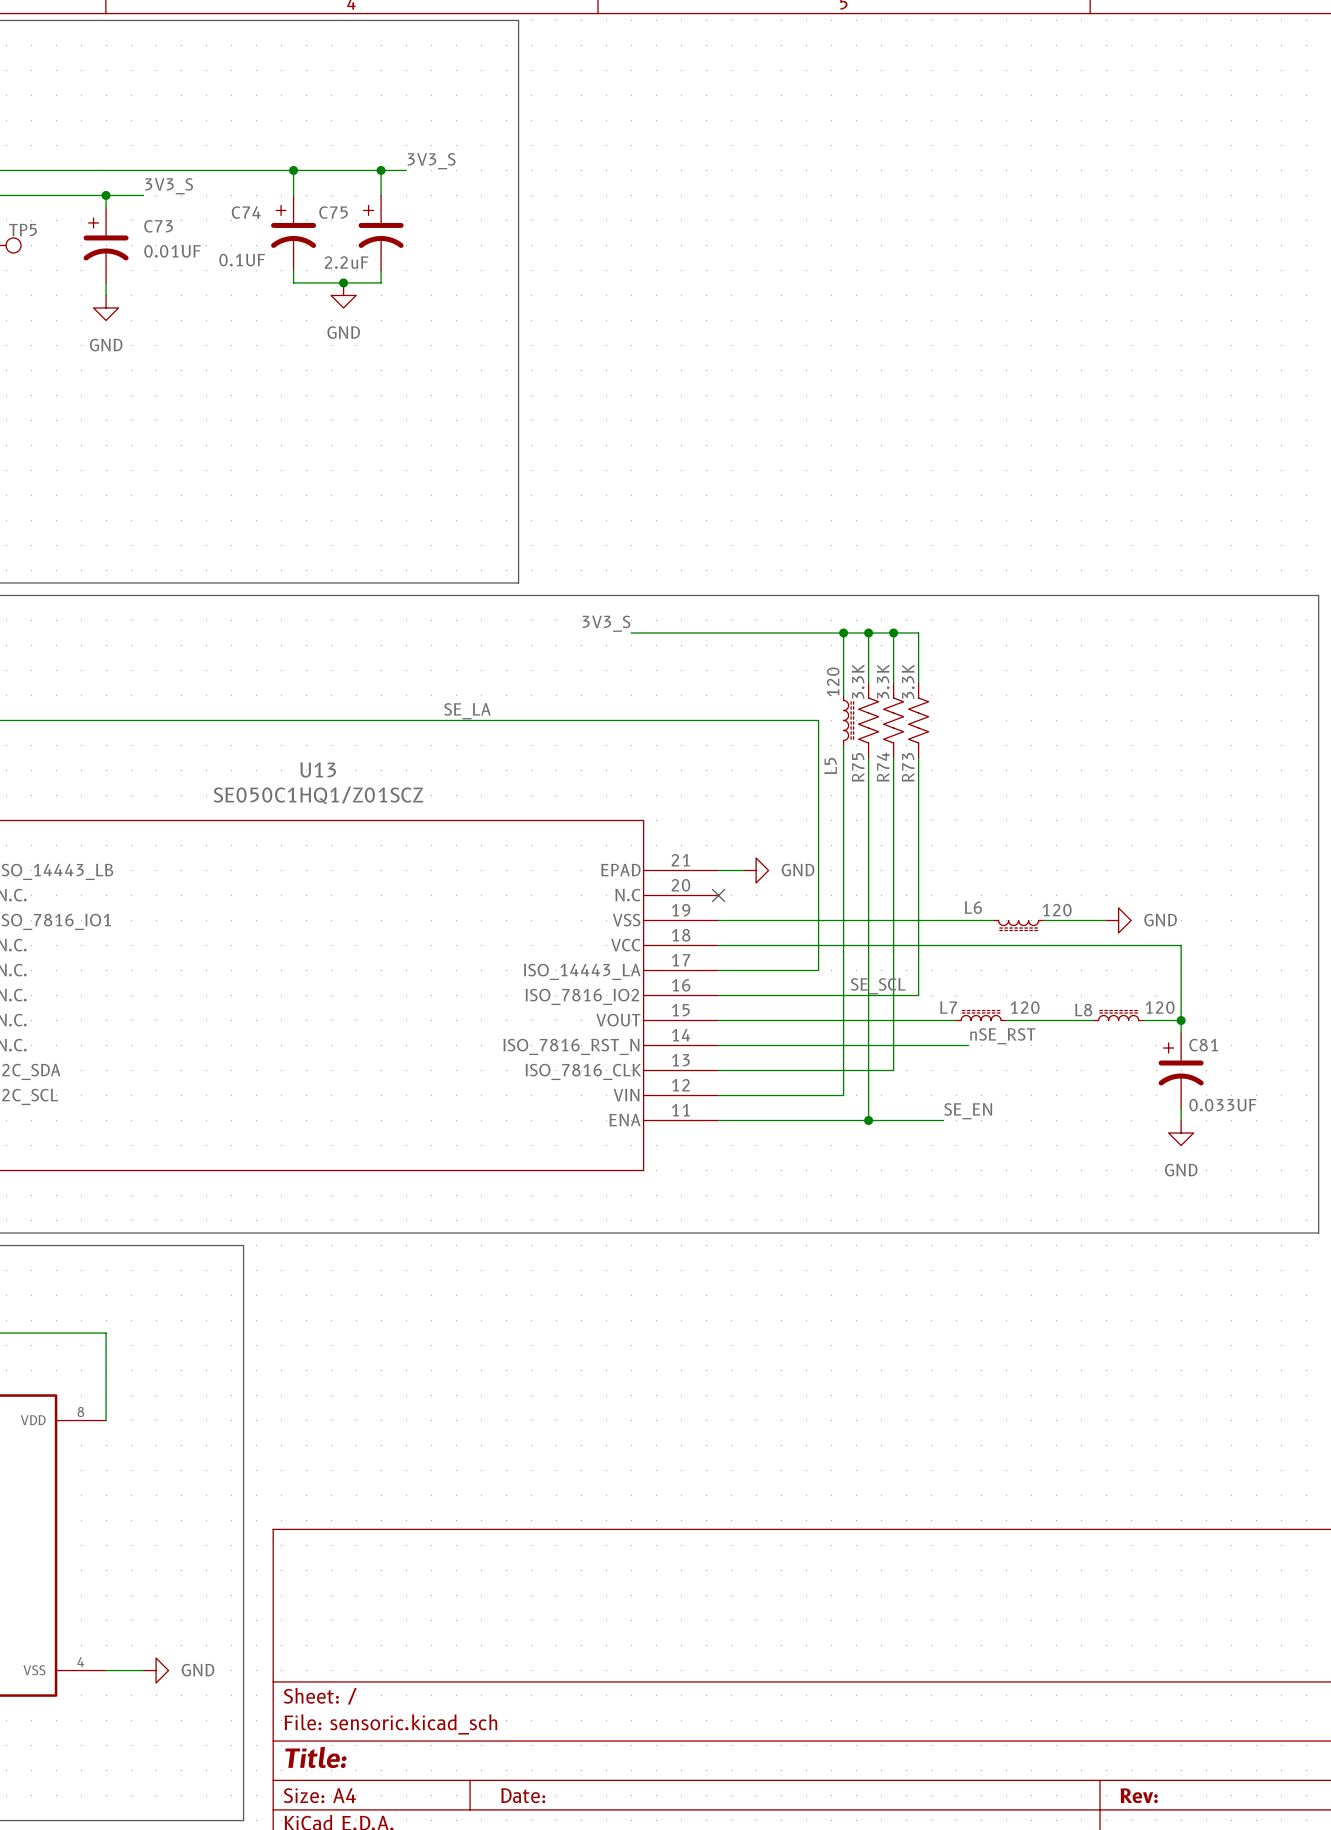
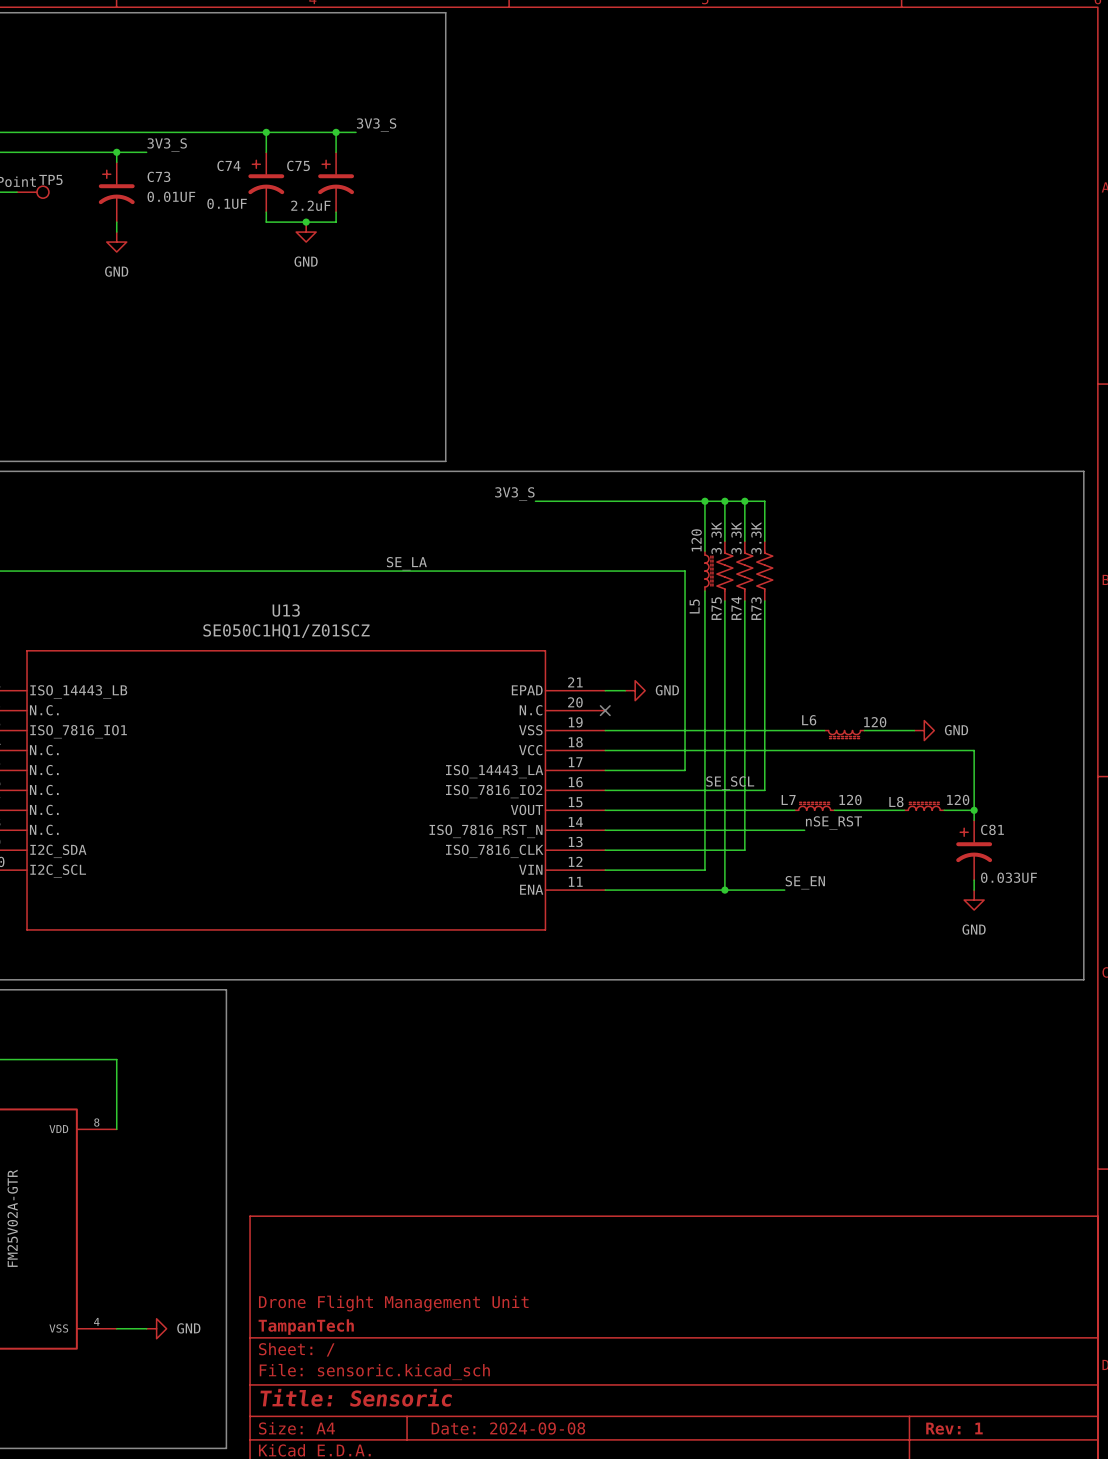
title block: none -> Drone Flight Management Unit (393, 1303)
title block: none -> TampanTech (306, 1327)
title block: Title: (315, 1757) -> Title: Sensoric (356, 1397)
title block: Date: (523, 1795) -> Date: 2024-09-08 (508, 1428)
title block: Rev: (1139, 1795) -> Rev: 1 (954, 1428)

